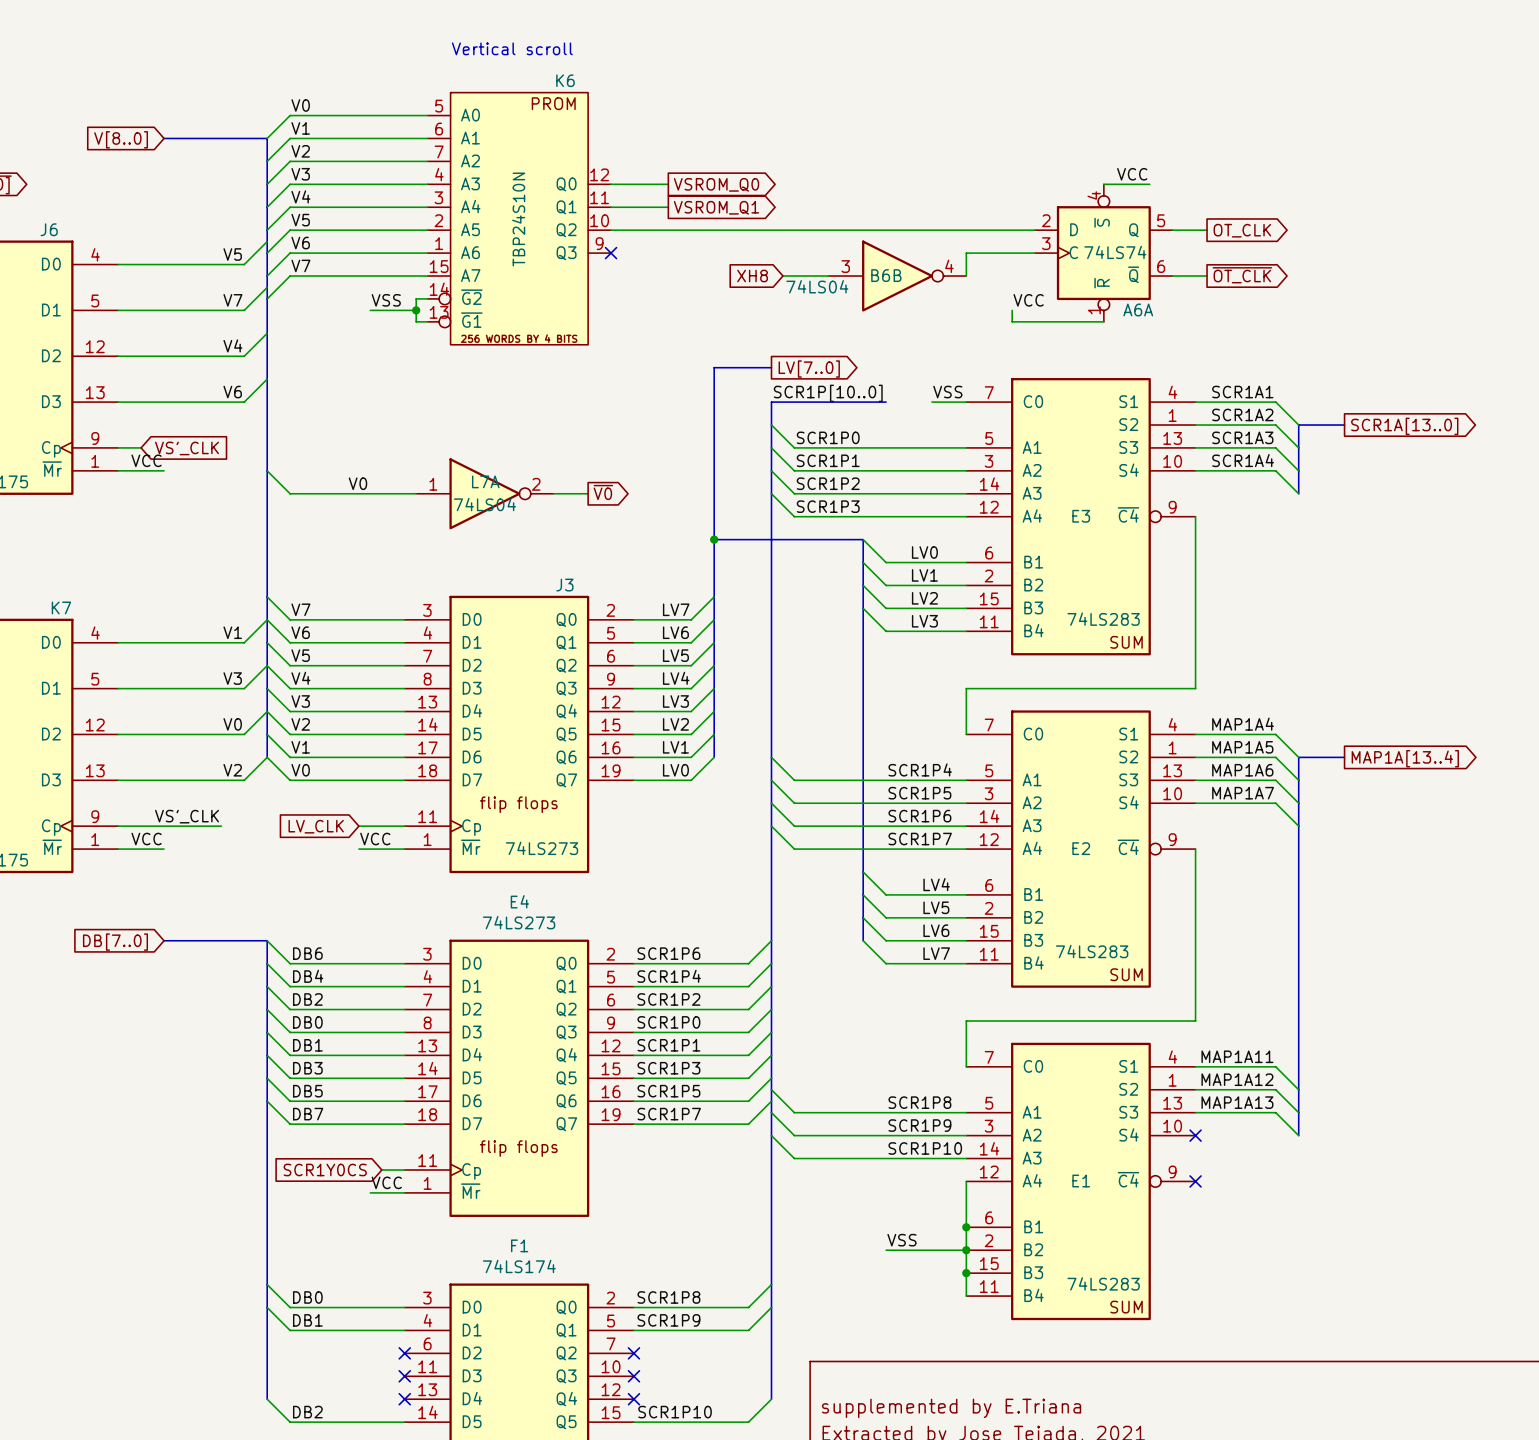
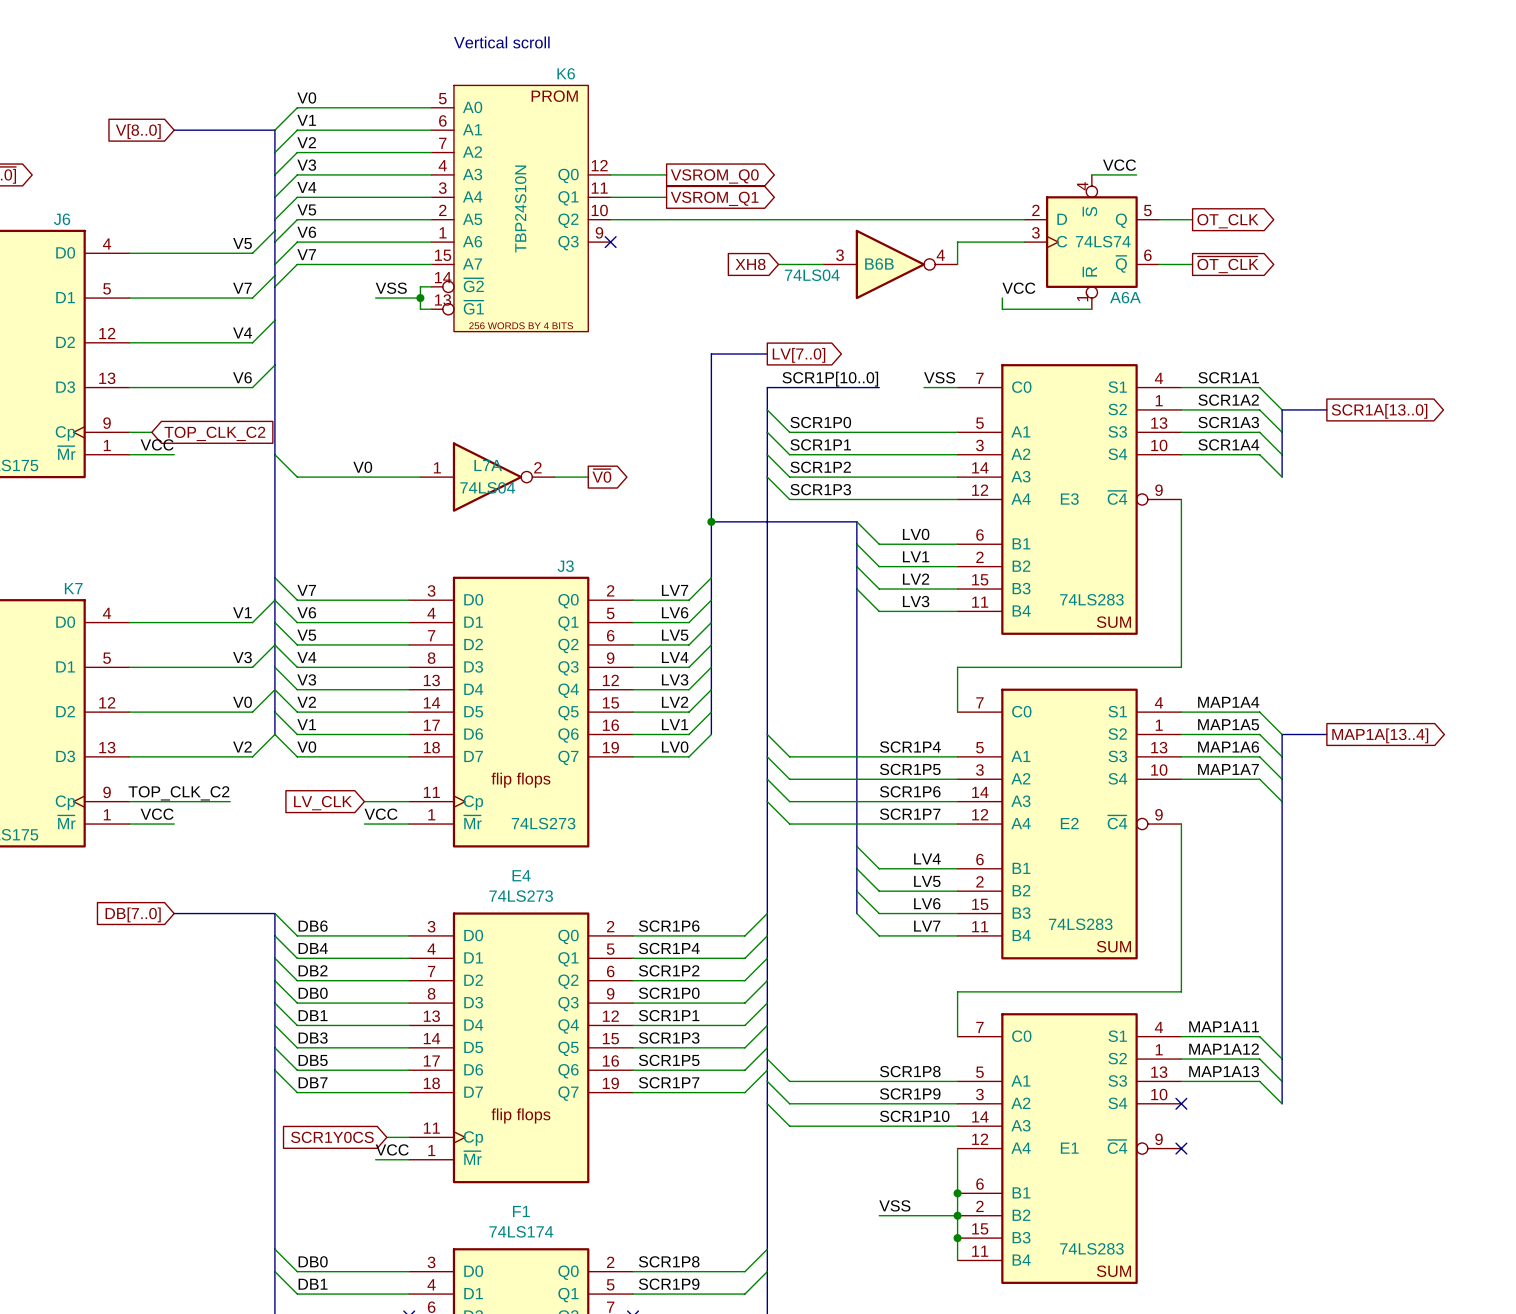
global label: VS'_CLK (187, 448) -> TOP_CLK_C2 (214, 433)
label: VS'_CLK (187, 816) -> TOP_CLK_C2 (178, 793)

